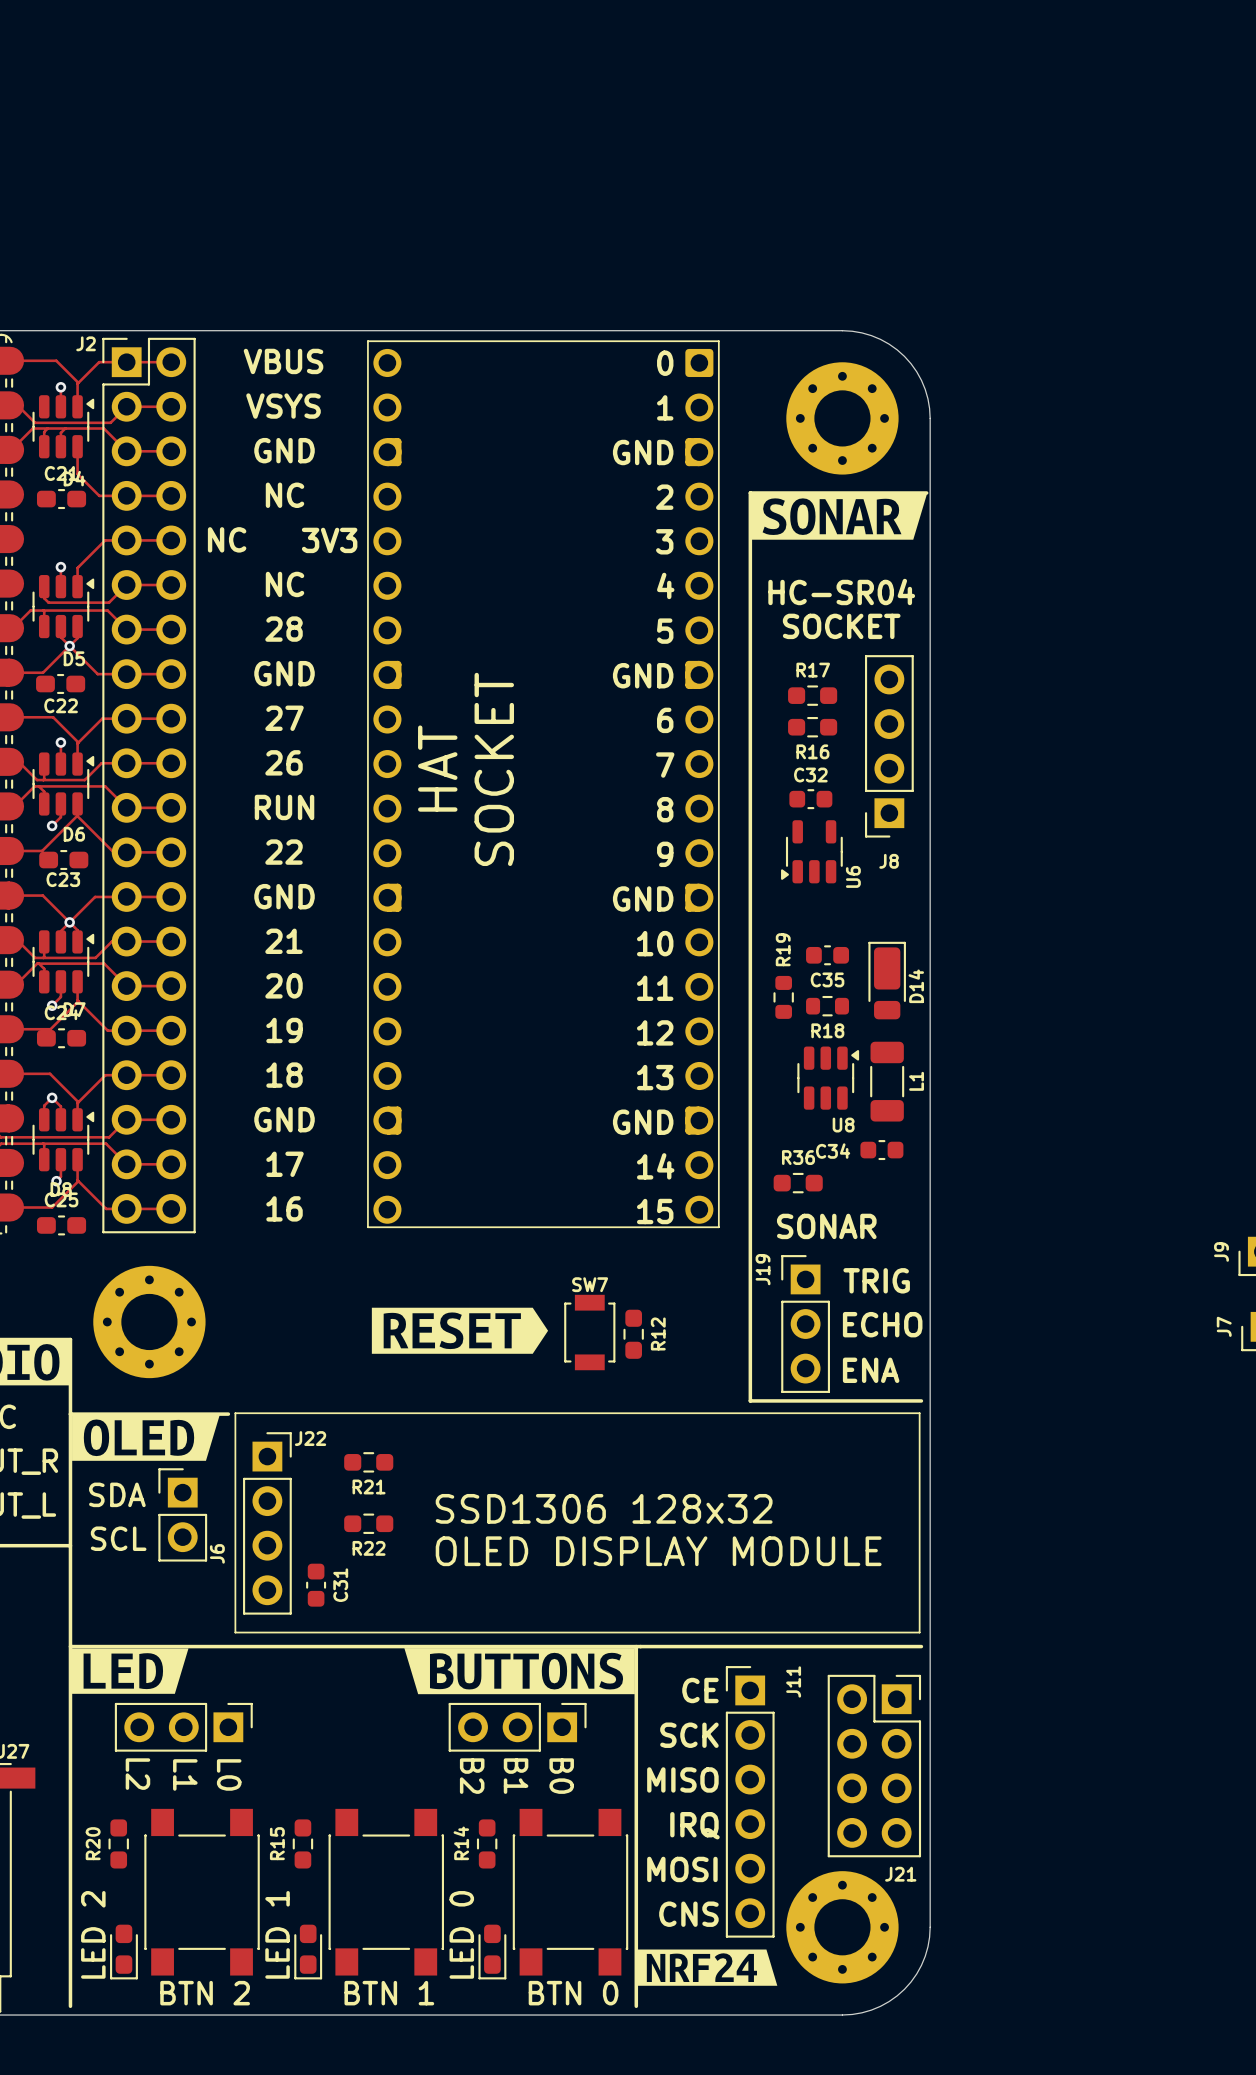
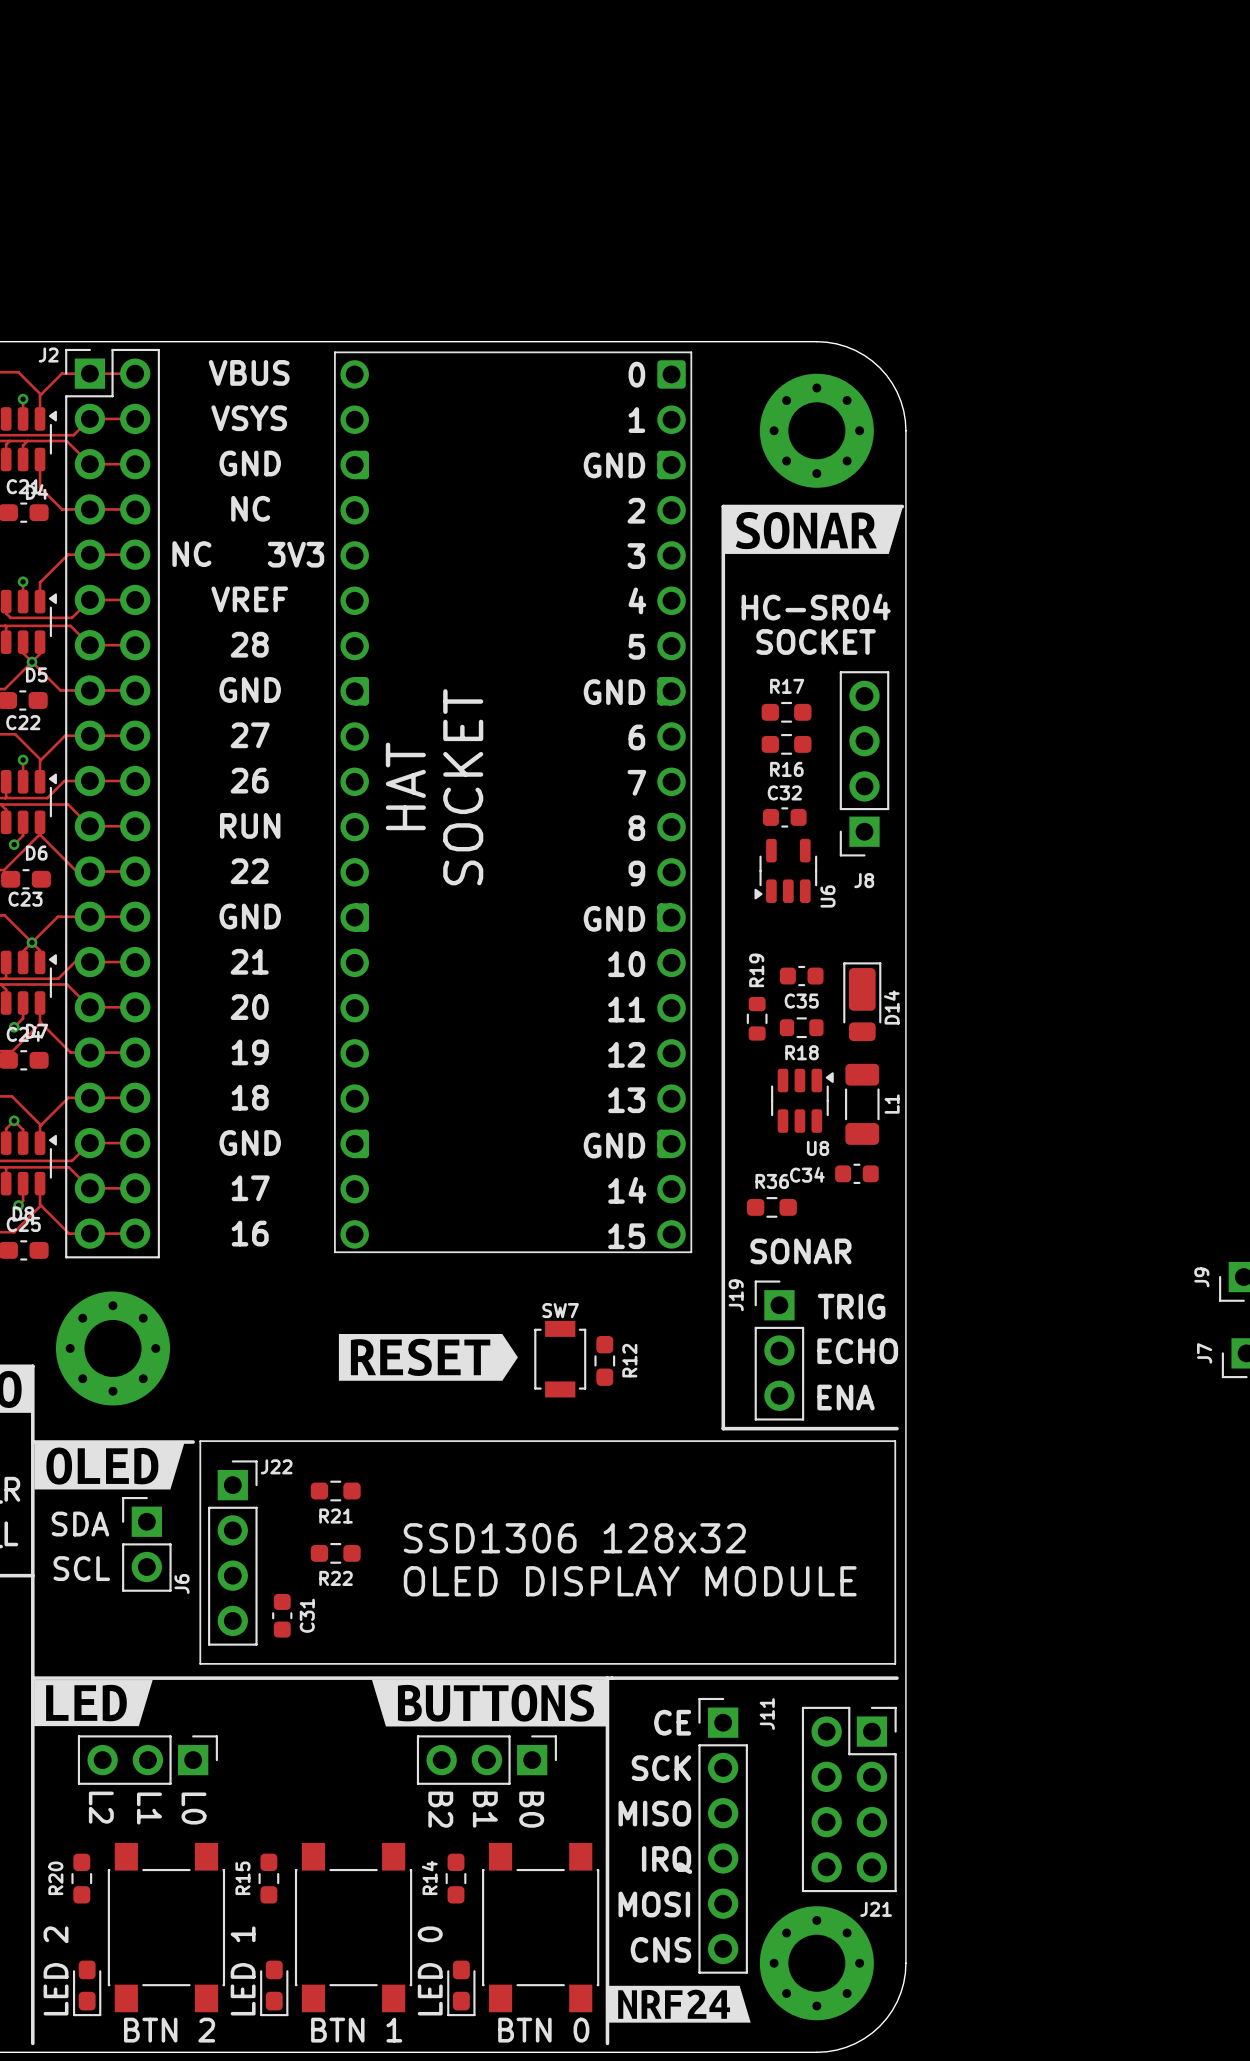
text: NC (285, 584) -> VREF (249, 599)

